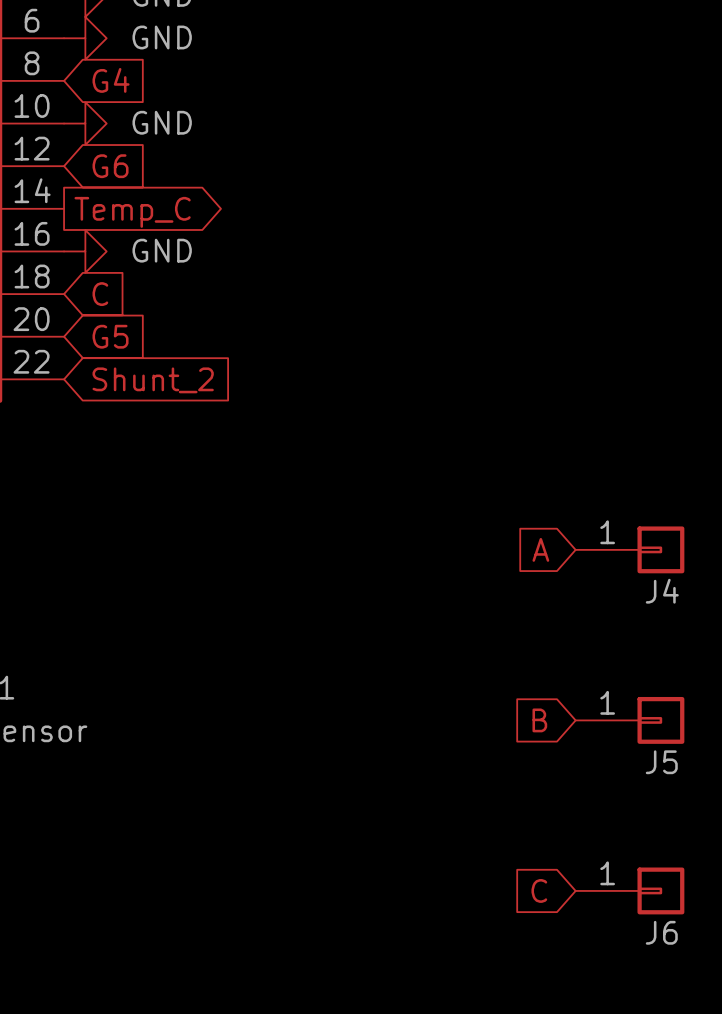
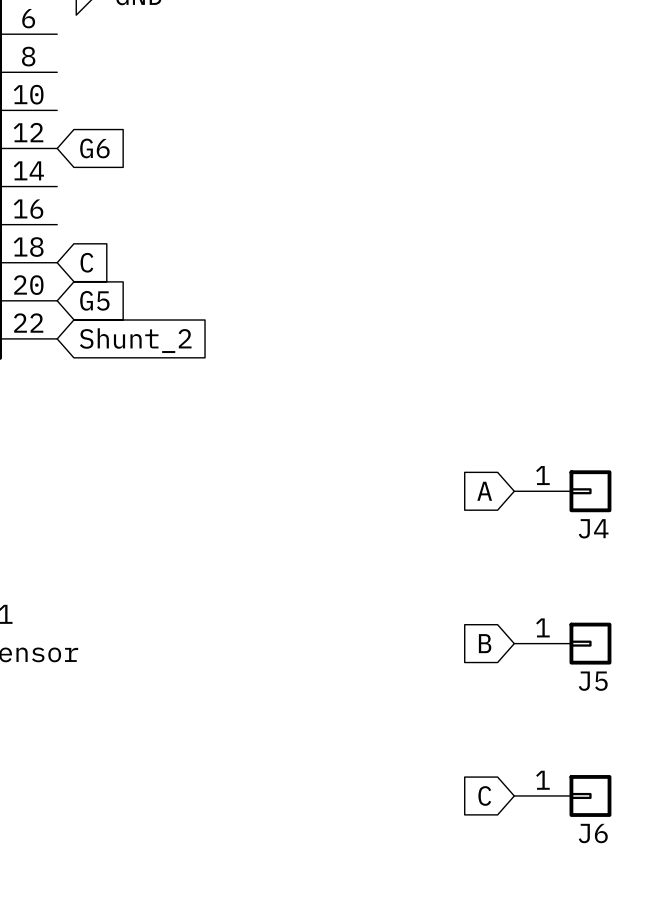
power symbol: GND (85, 38) -> none
global label: G4 (111, 80) -> none
power symbol: GND (85, 123) -> none
global label: Temp_C (132, 212) -> none
power symbol: GND (85, 251) -> none

